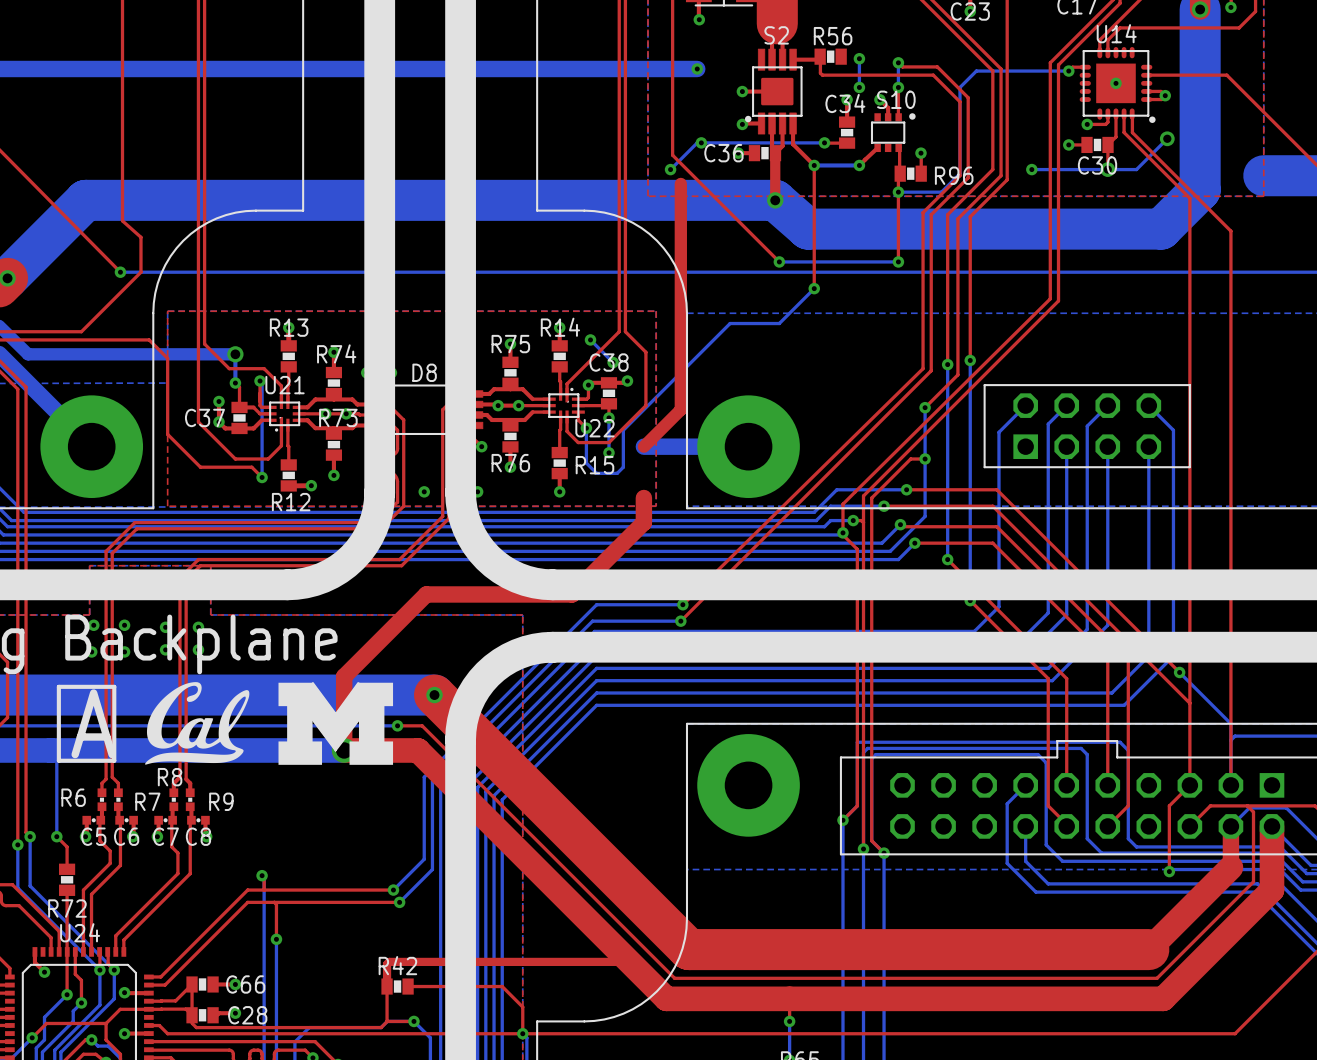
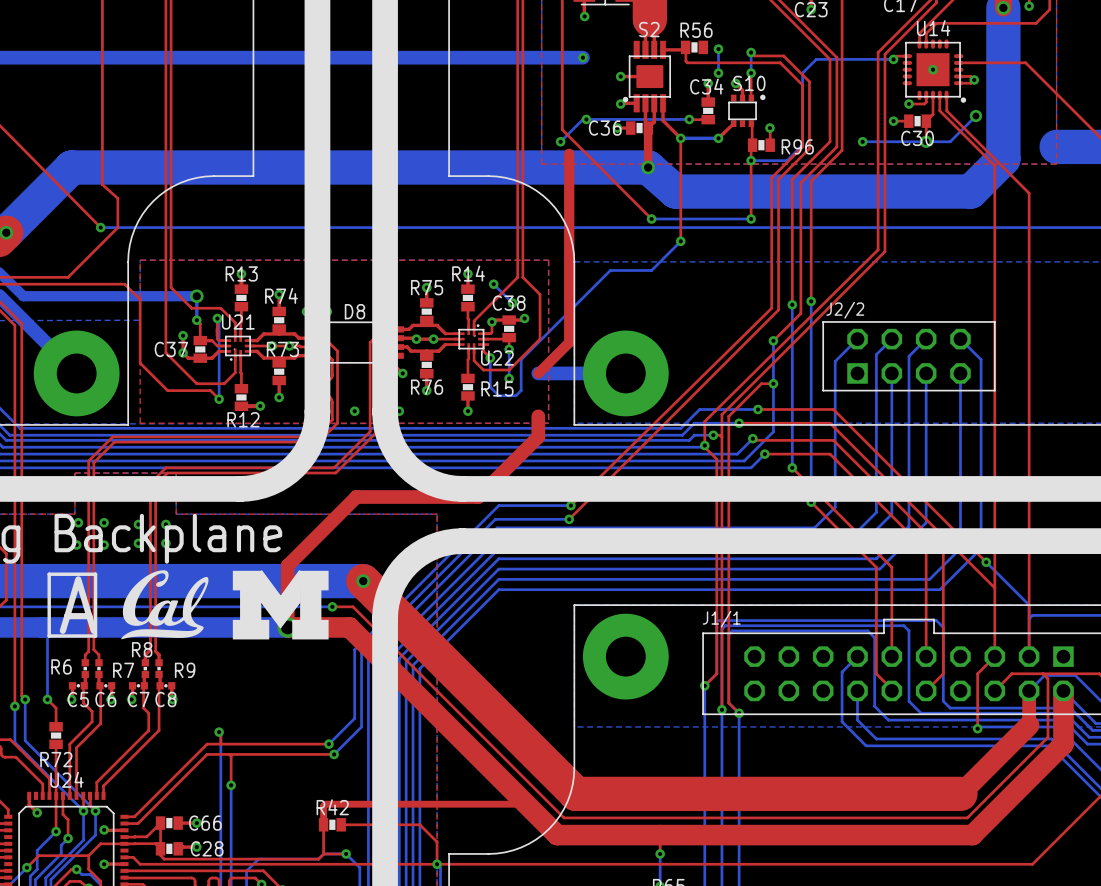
text: none -> J2/2 (845, 310)
text: none -> J1/1 (721, 619)

